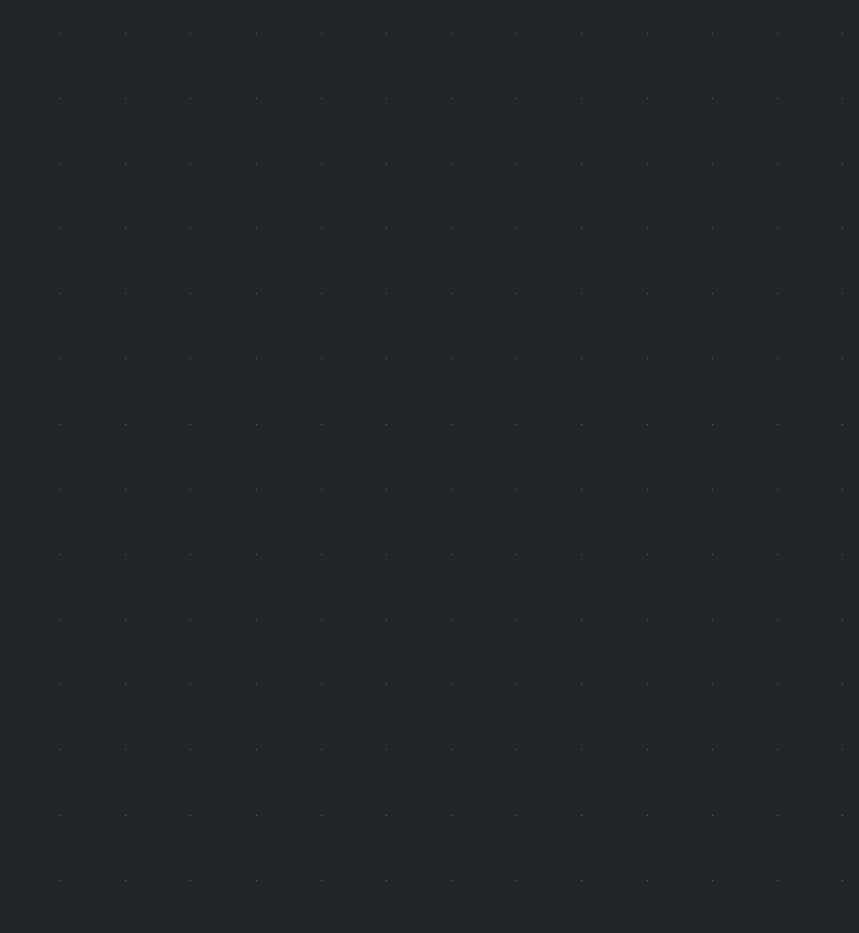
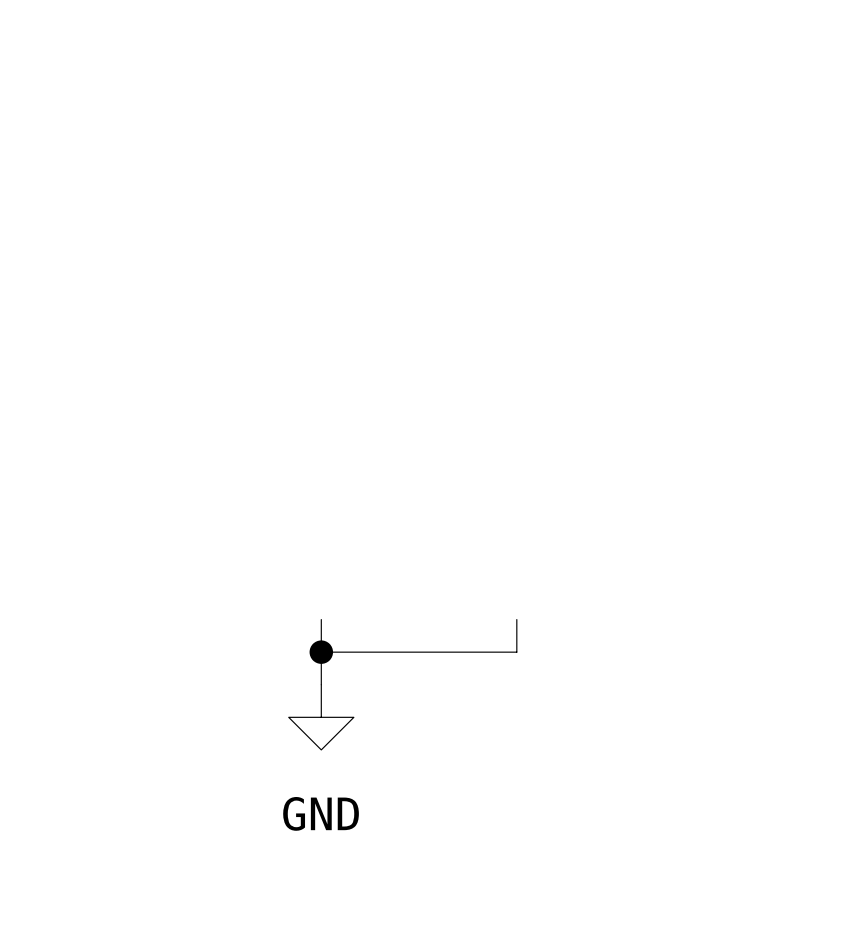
wire: none -> (321, 619) (321, 684)
wire: none -> (516, 619) (516, 652) (321, 652)
junction: none -> (321, 652)
power symbol: none -> GND (321, 717)

